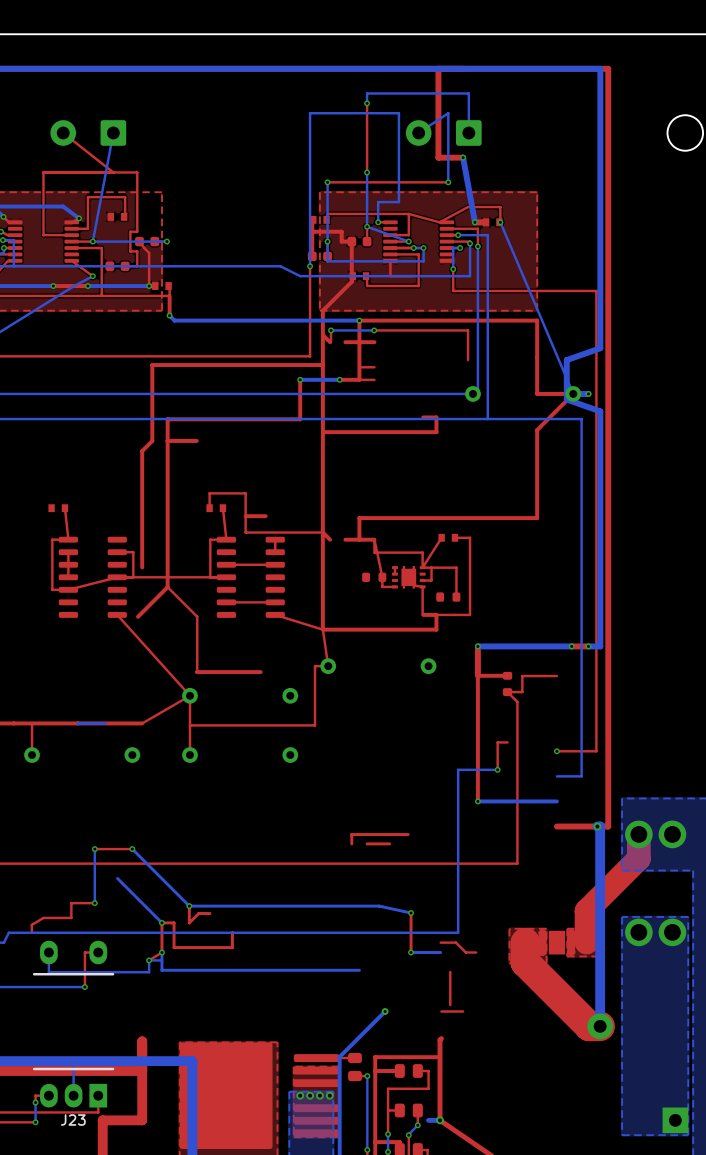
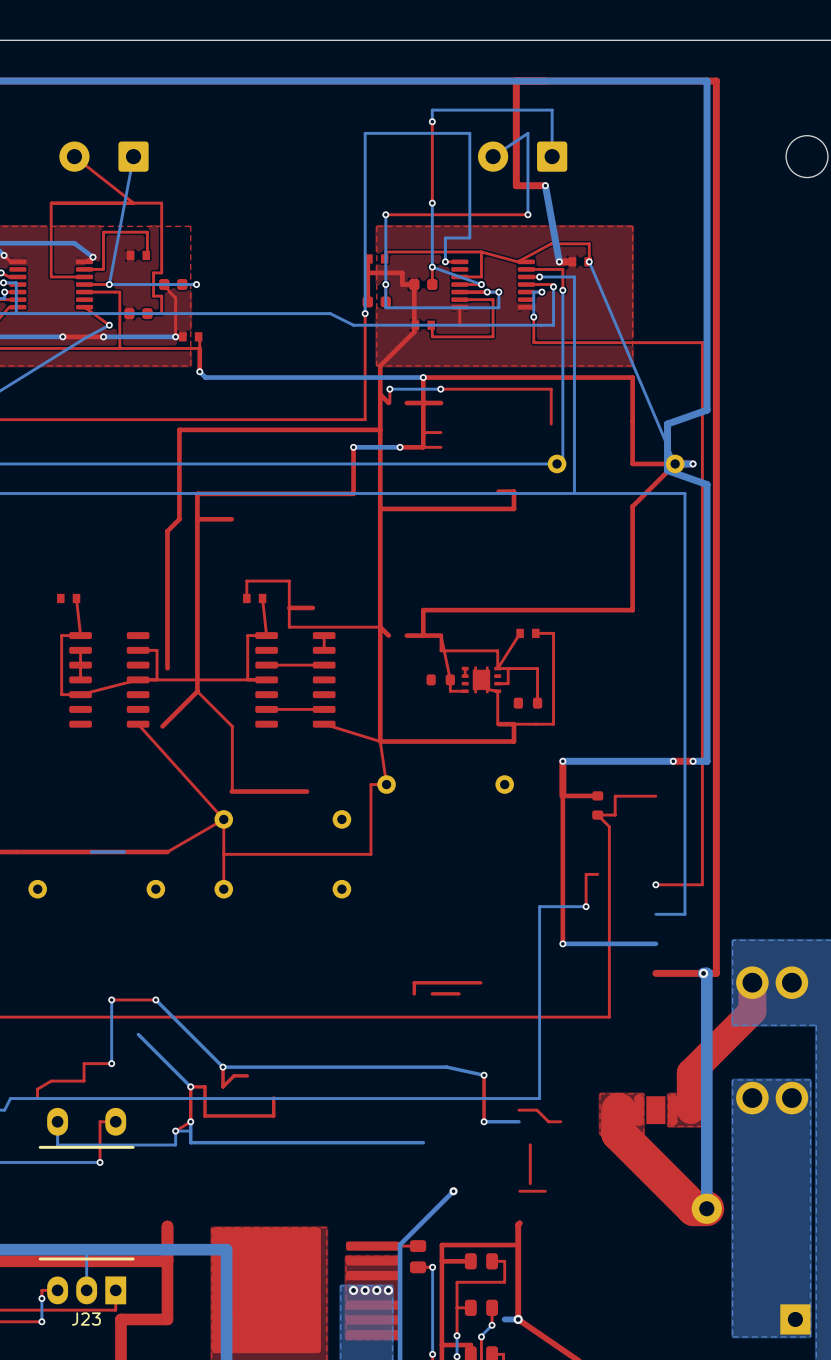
top track: (32, 723) (32, 755) -> none

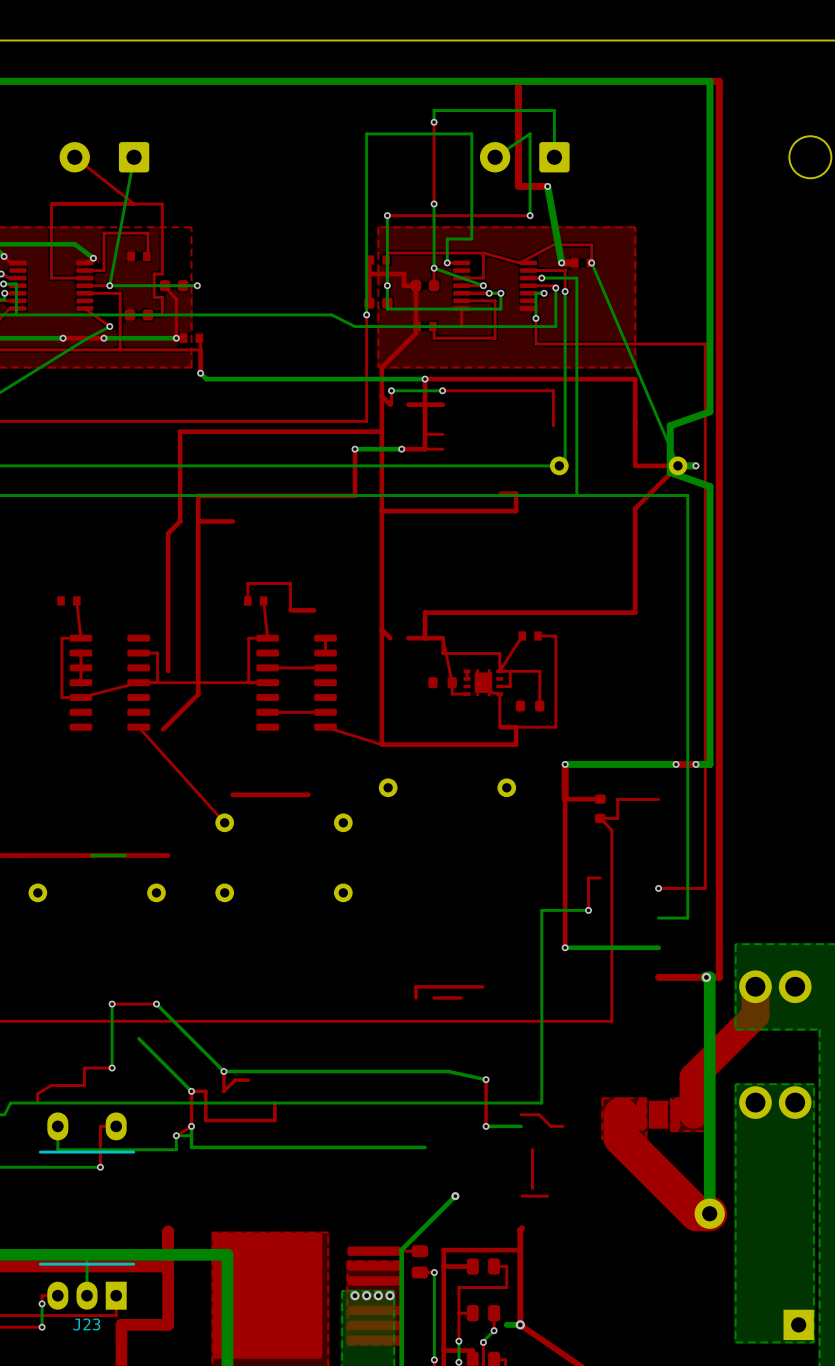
top track: (289, 607) (289, 627) (380, 627) -> none
top track: (197, 691) (232, 726) (232, 791) -> none
top track: (380, 741) (386, 784) (370, 784) (370, 854) (223, 854) -> none
top track: (167, 851) (223, 819) (223, 889) -> none

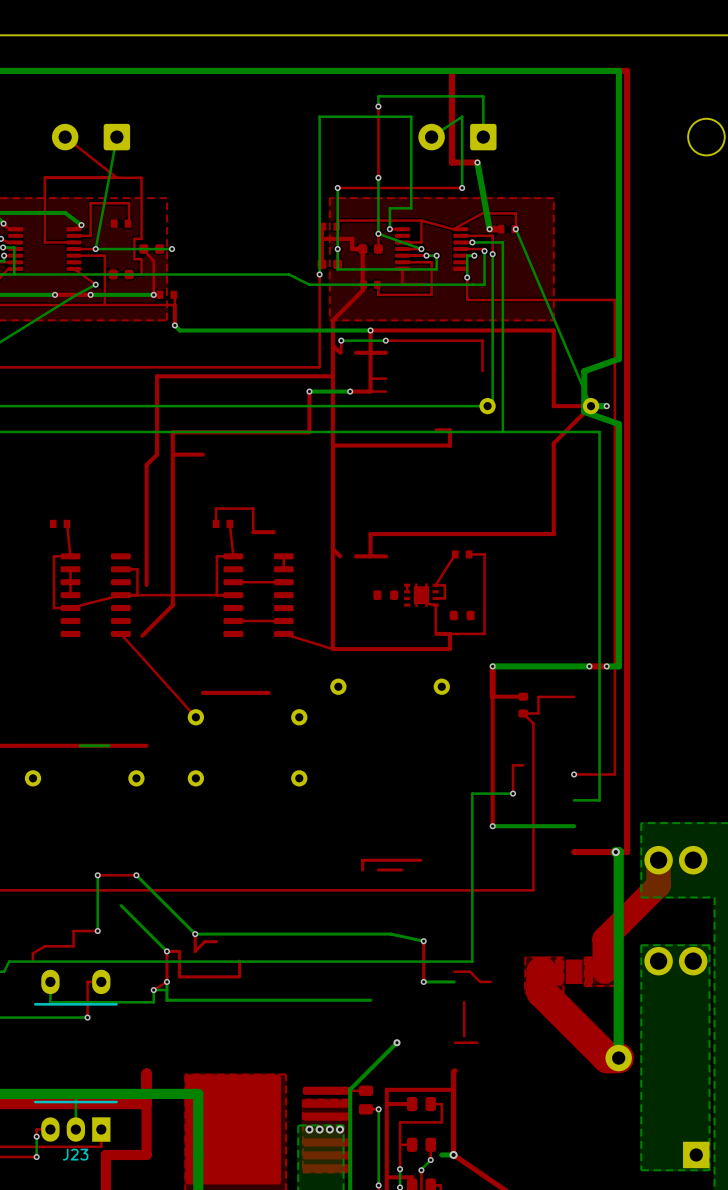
top track: (499, 671) (499, 653) (442, 653) (442, 638) (452, 682) (452, 694) (467, 694) -> none
top track: (510, 671) (539, 671) (539, 706) -> none

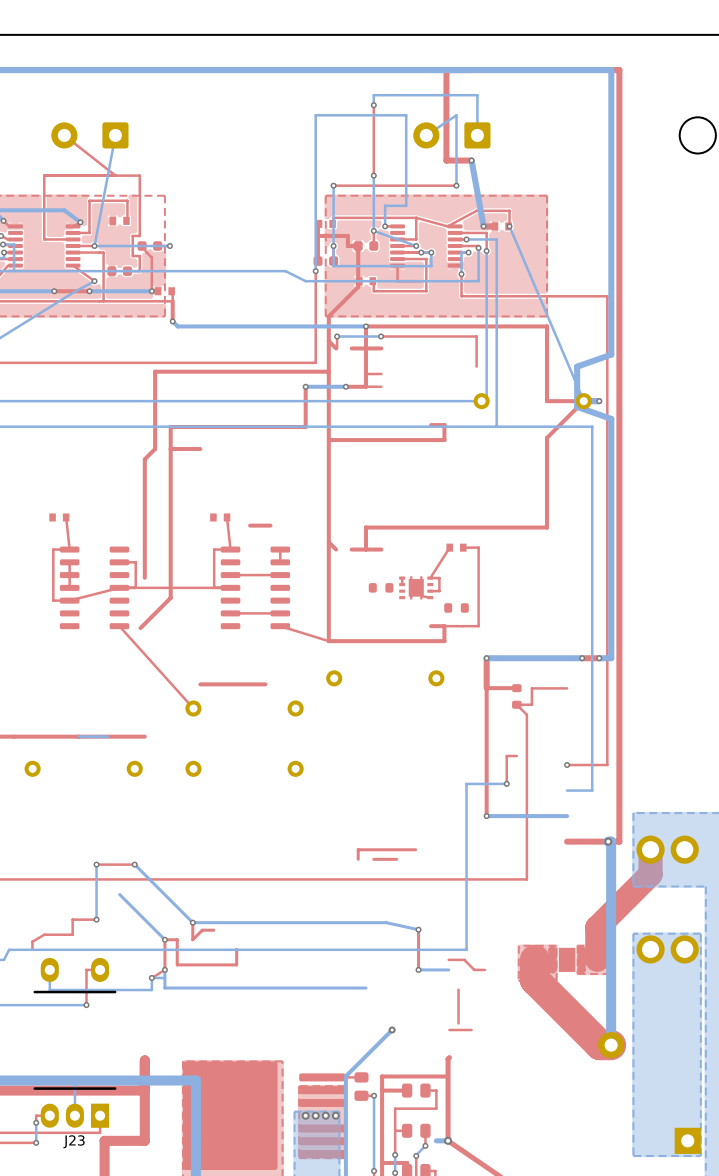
top track: (216, 523) (216, 508) (253, 508) (253, 532) -> none
top track: (435, 605) (435, 633) -> none

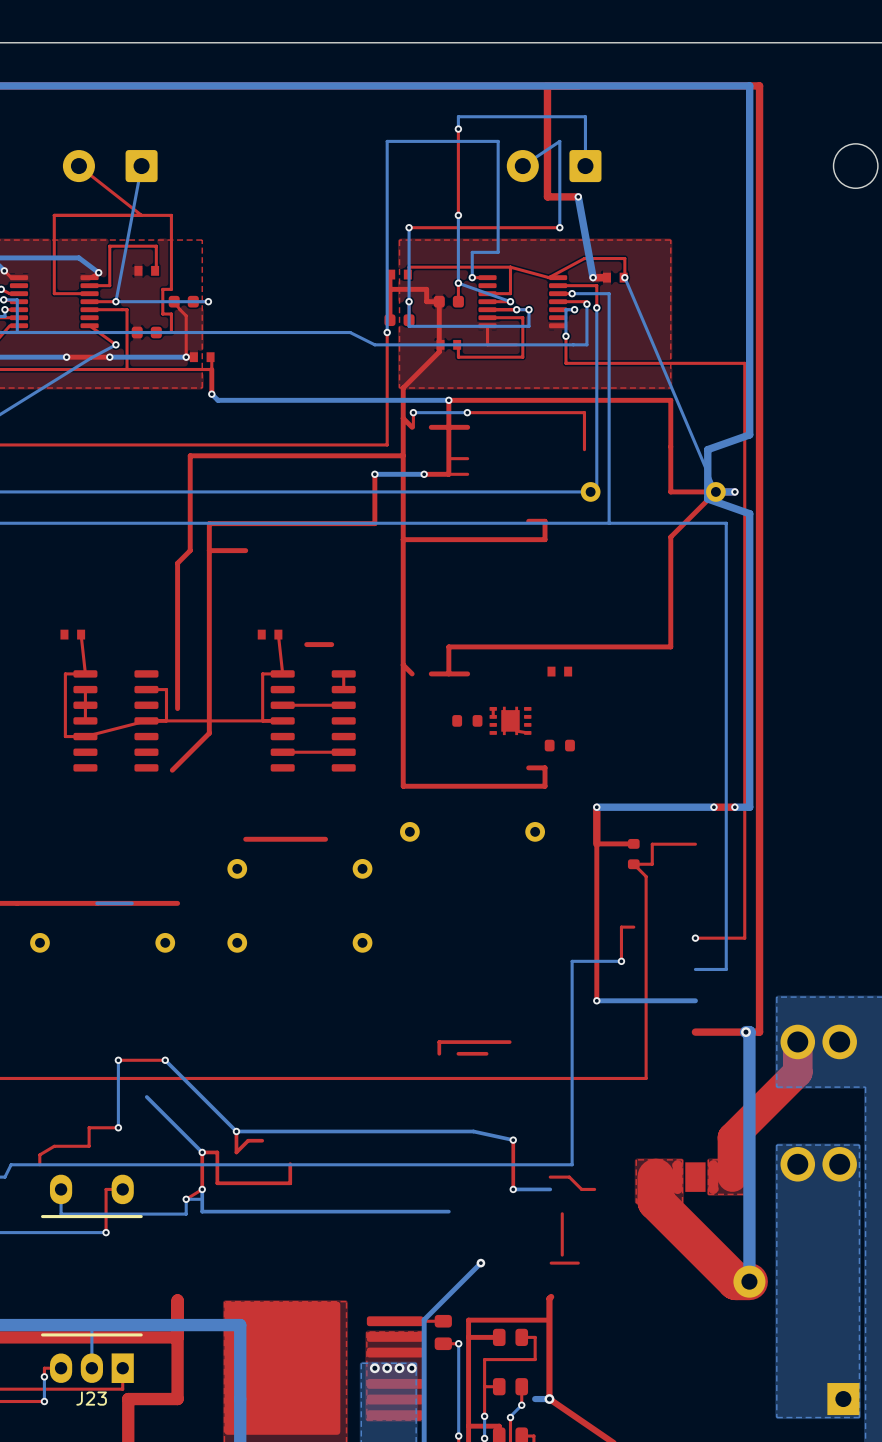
top track: (449, 547) (430, 578) (439, 578) (439, 591) (430, 591) -> none
top track: (463, 547) (478, 547) (478, 626) (444, 626) -> none
top track: (119, 626) (193, 708) -> none
top track: (280, 626) (328, 641) -> none

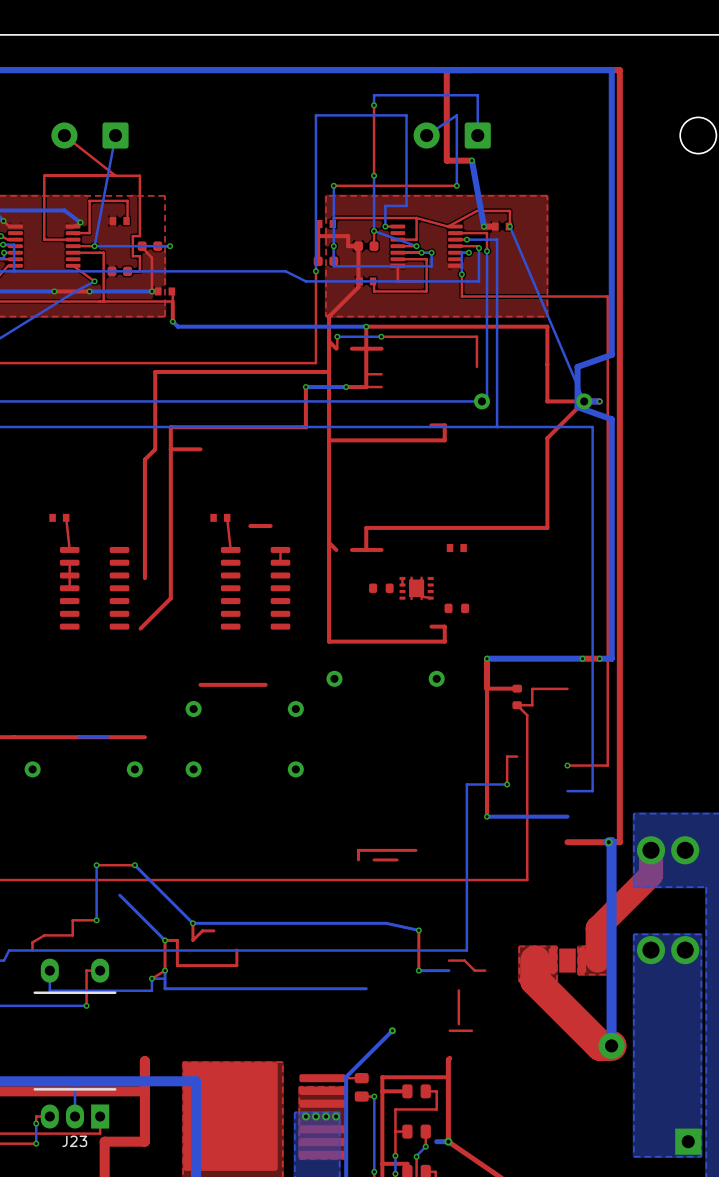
top track: (85, 673) (65, 673) (65, 736) (85, 736) (146, 720) (282, 720) -> none
top track: (282, 673) (262, 673) (262, 720) -> none
top track: (146, 689) (166, 689) (166, 720) -> none
top track: (343, 705) (282, 705) -> none
top track: (343, 752) (282, 752) -> none

